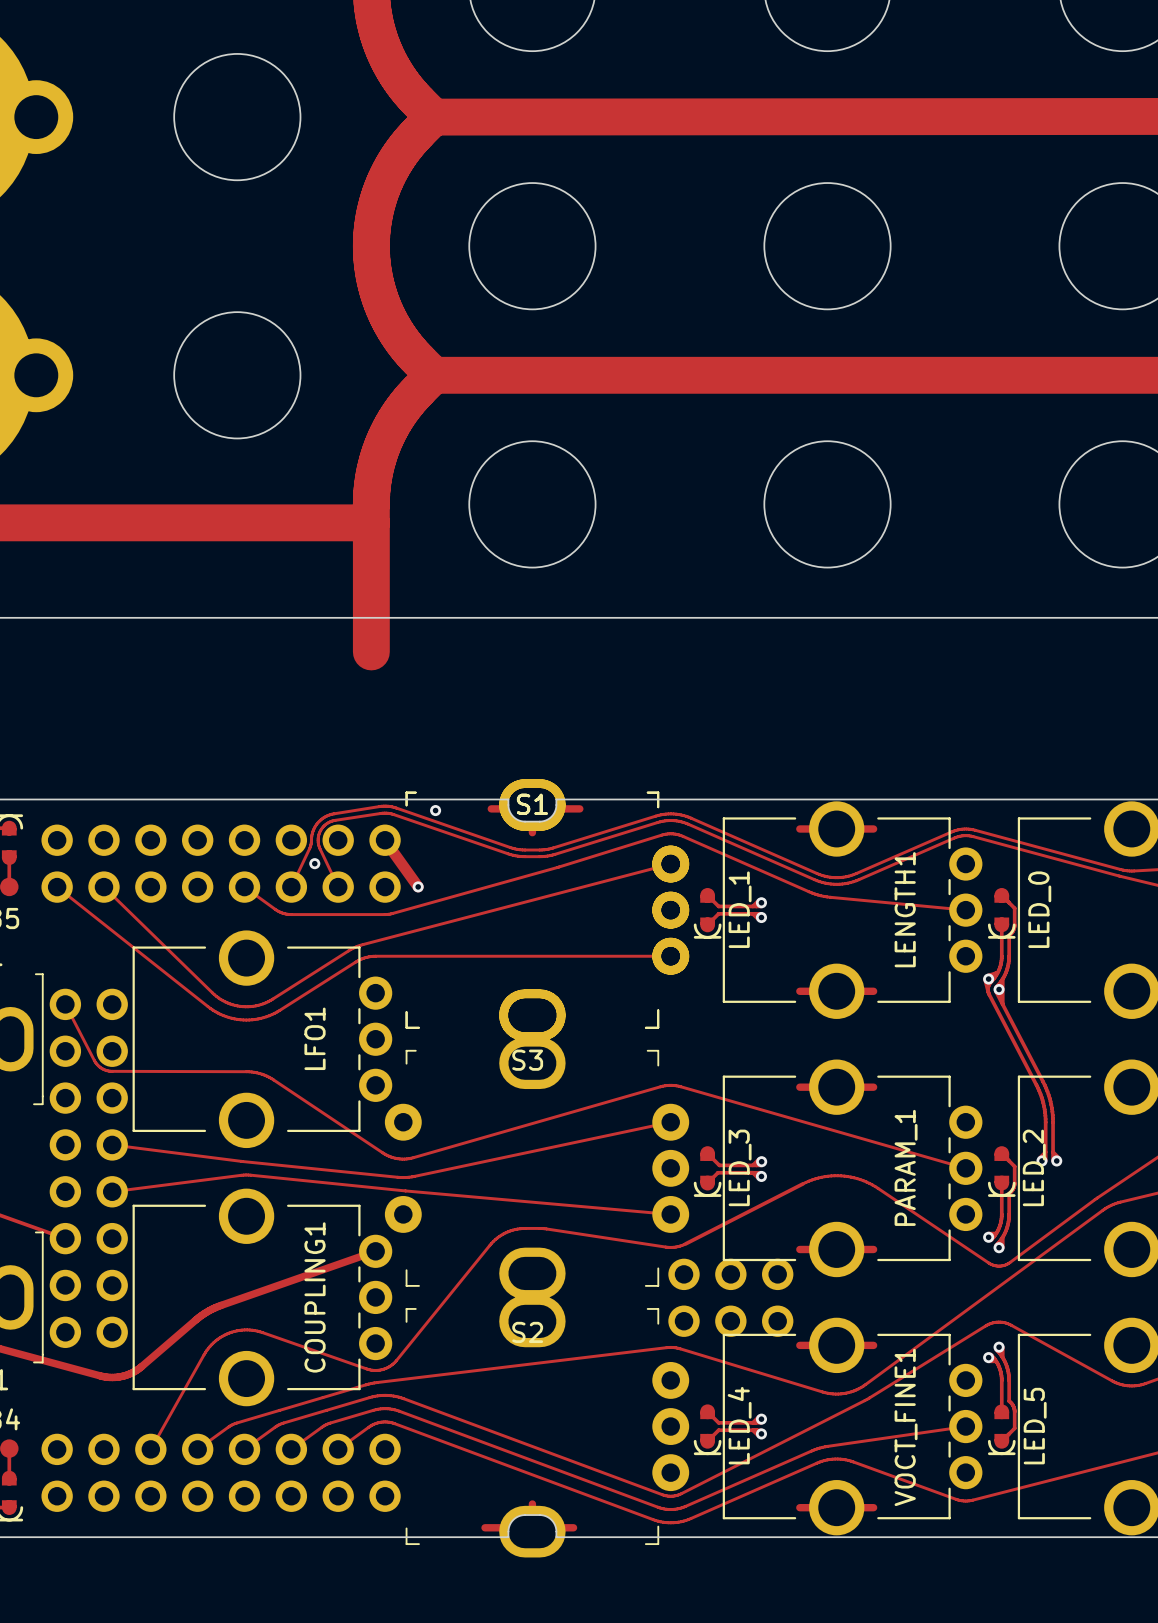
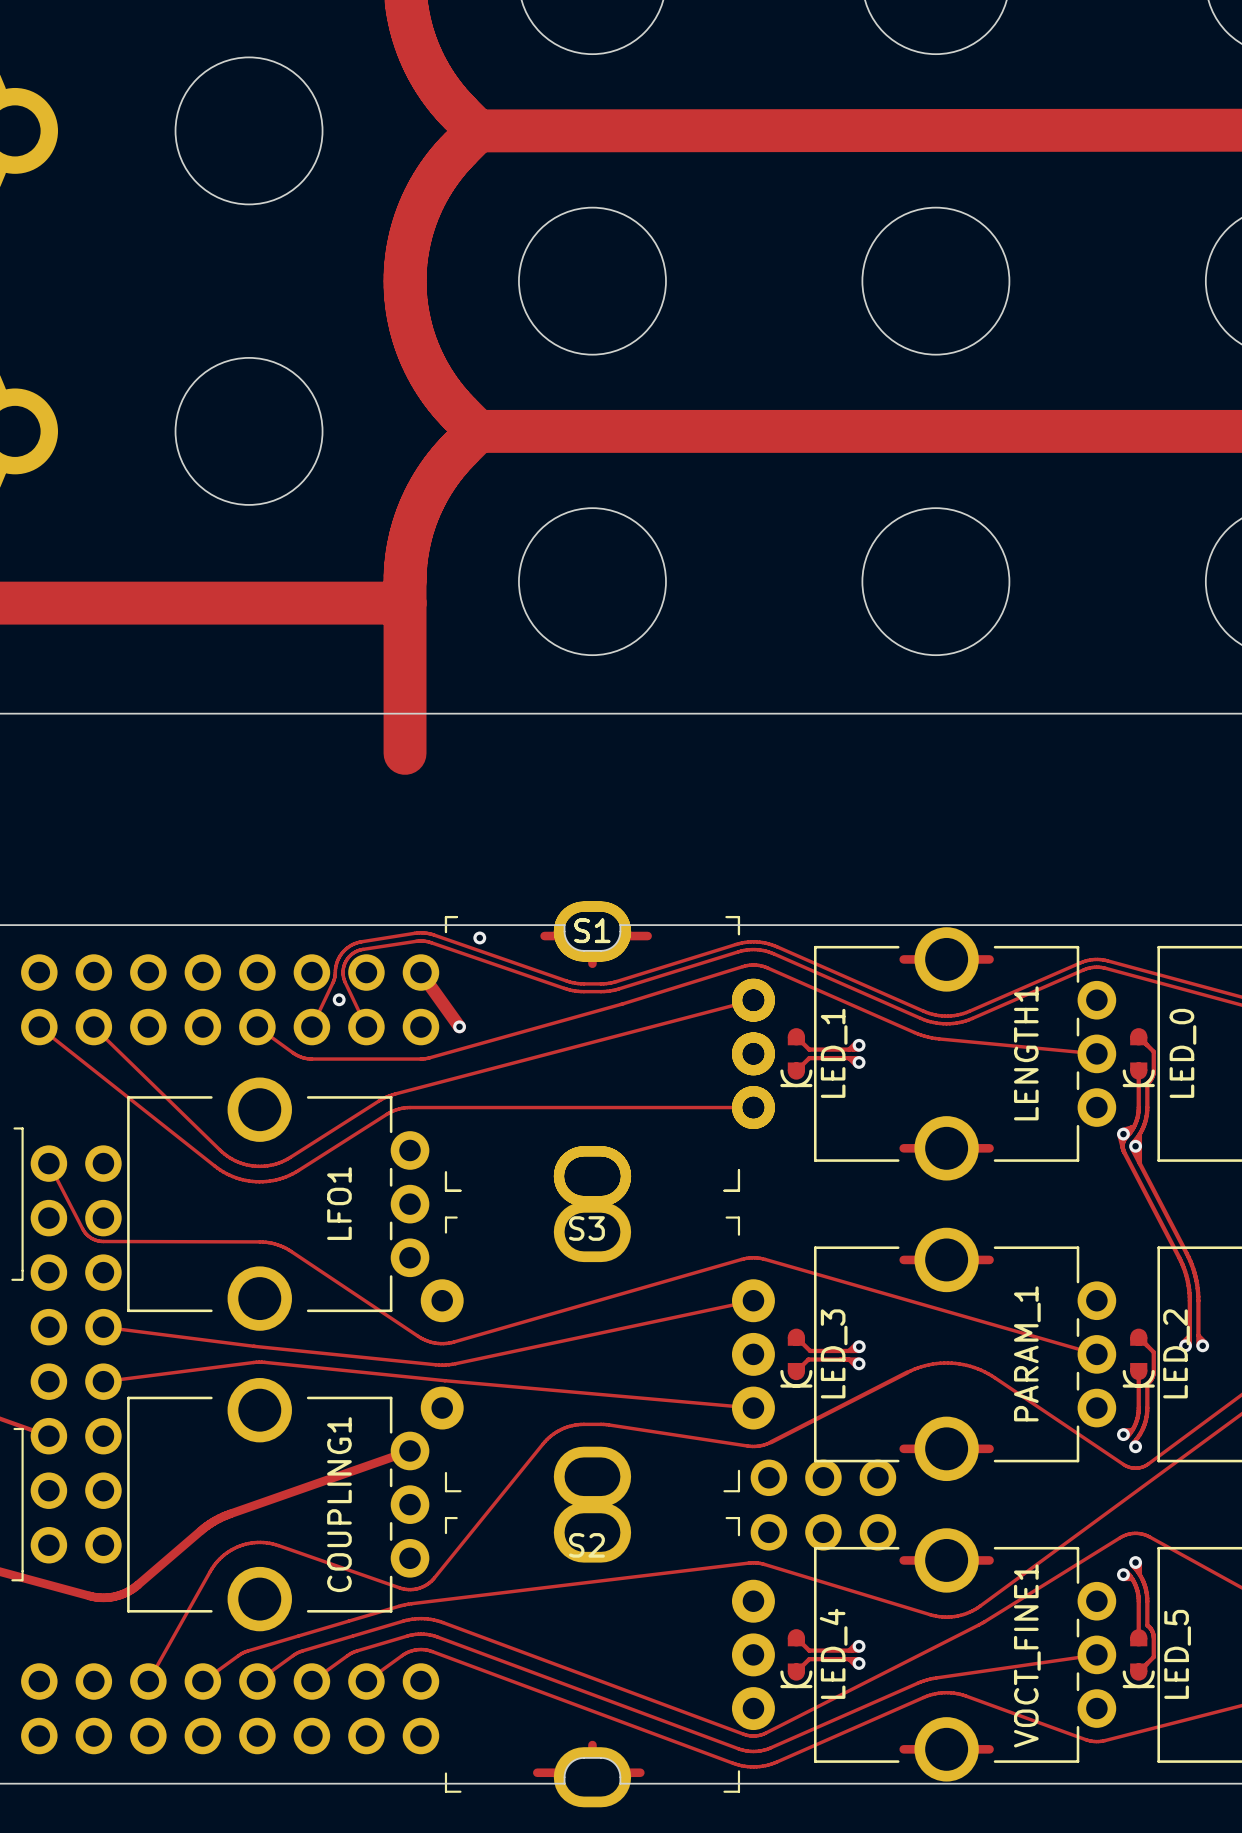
track: (1002, 1237) (1002, 1247) -> none

